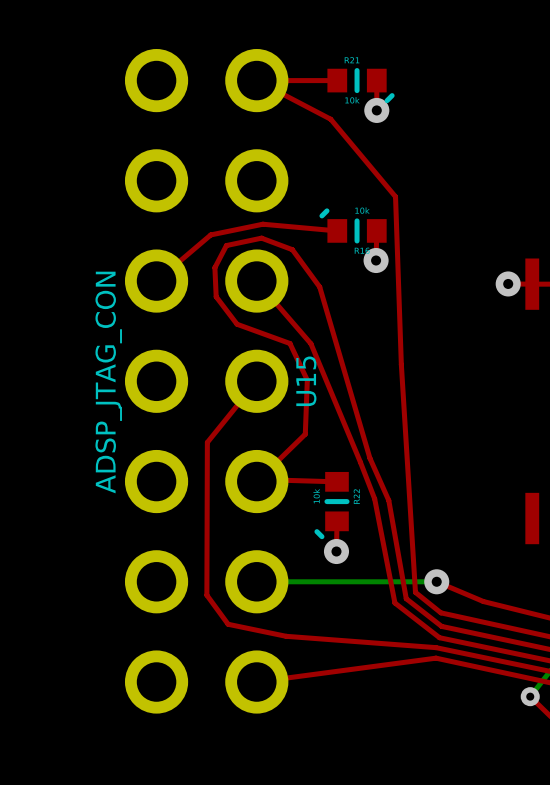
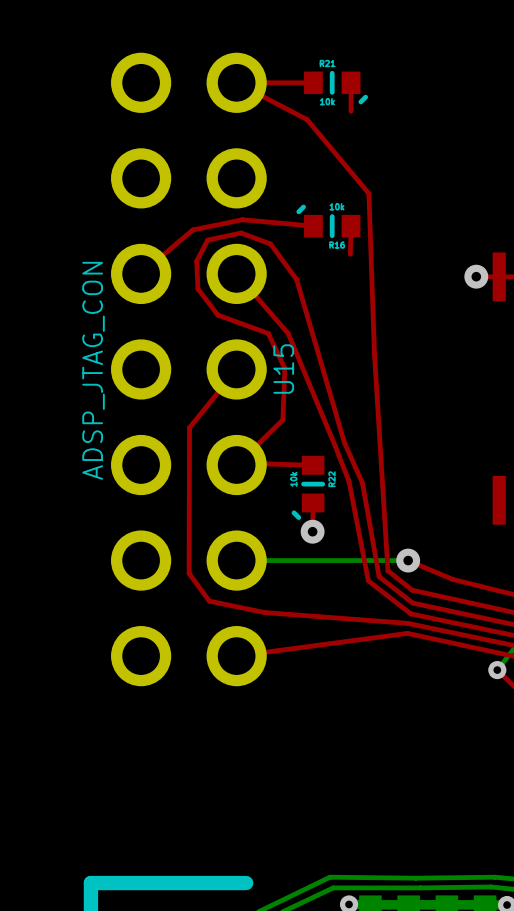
via: (376, 110) -> none
via: (376, 260) -> none

